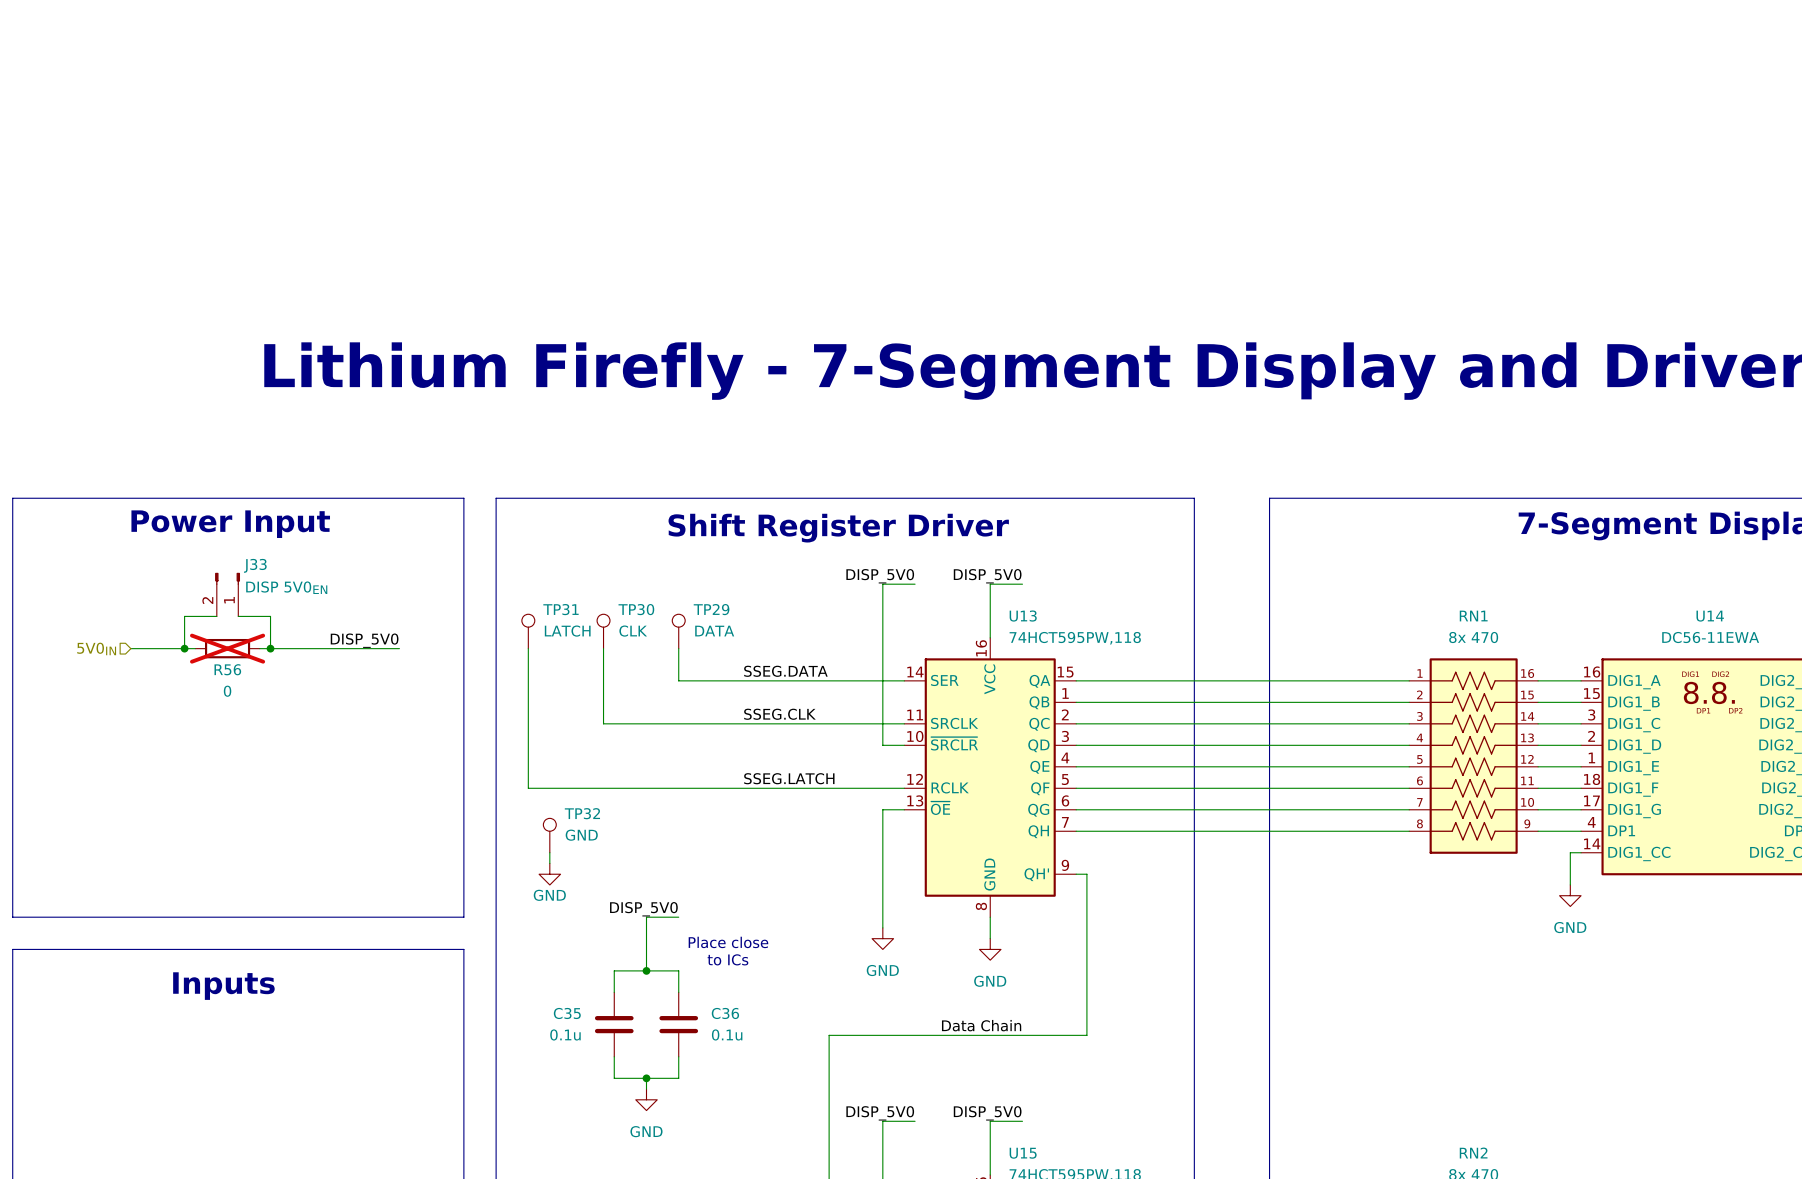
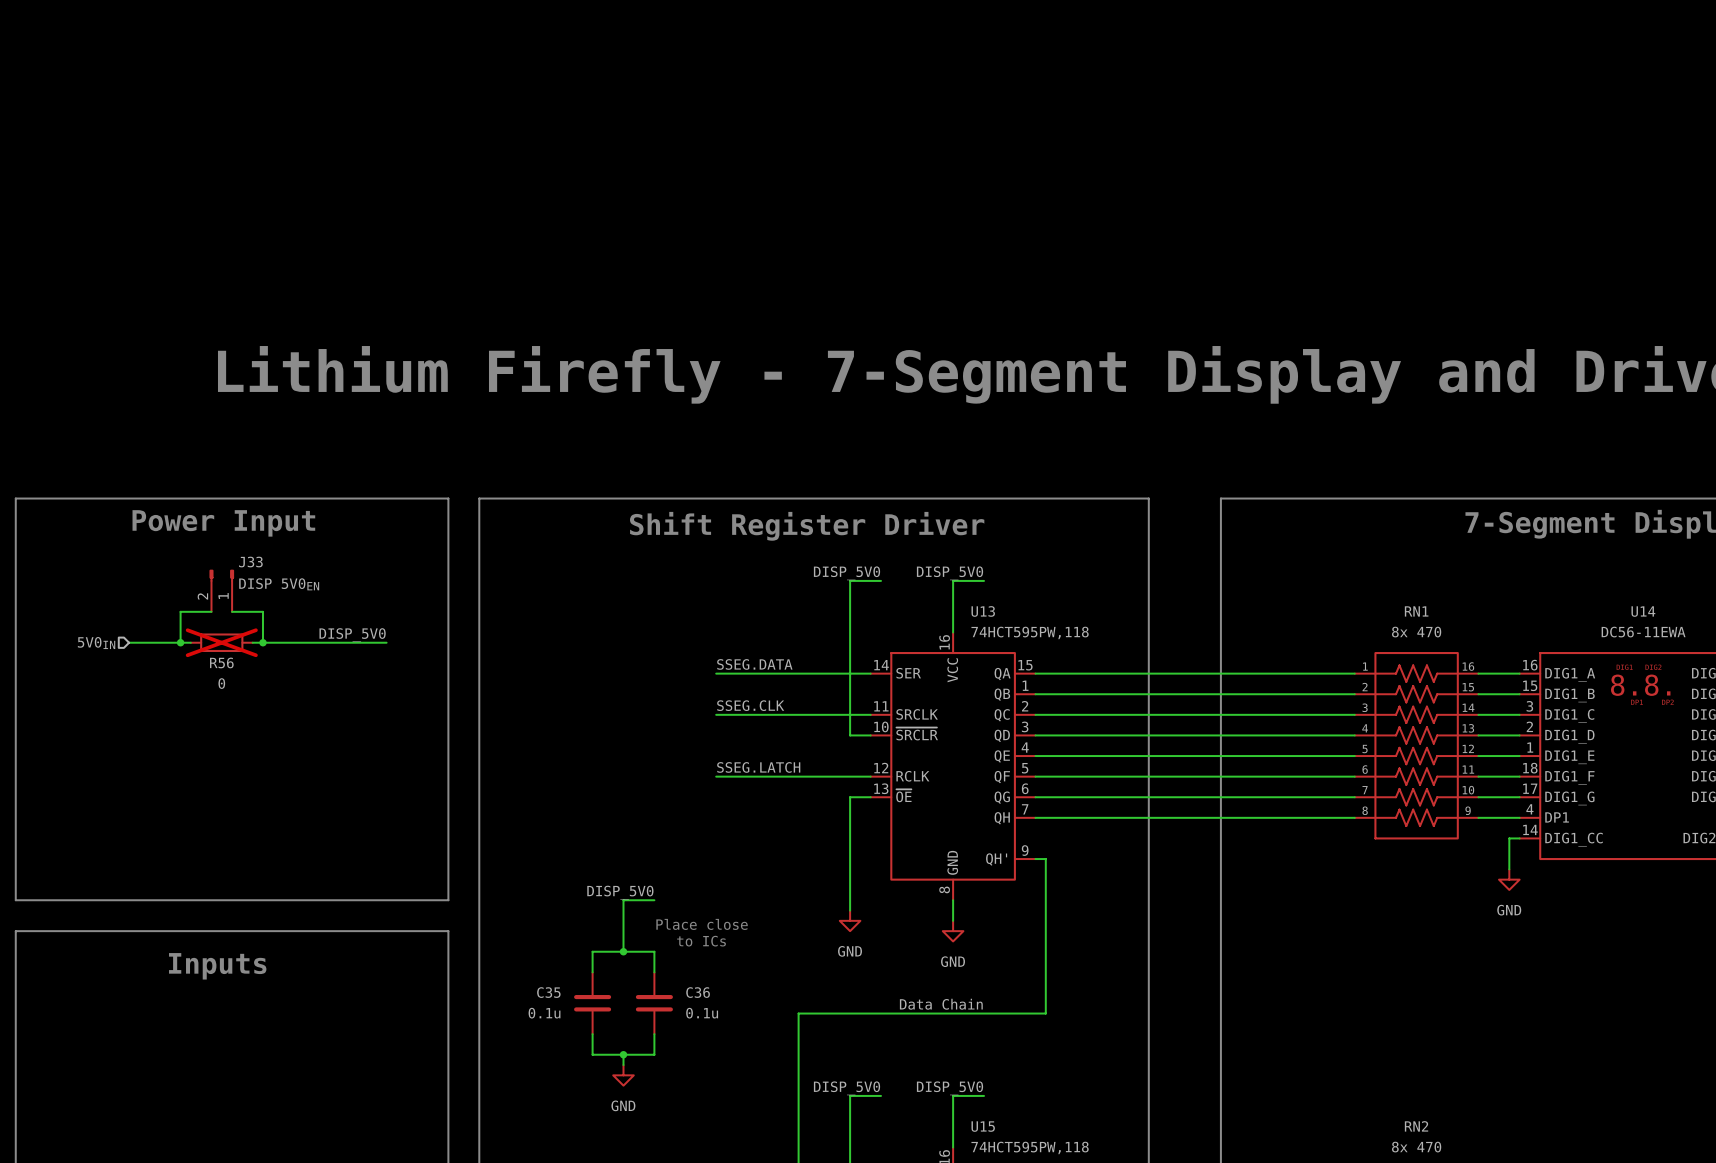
TP31: LATCH (528, 631) -> none
TP30: CLK (603, 631) -> none
TP29: DATA (678, 631) -> none
wire: (528, 648) (528, 788) (743, 788) -> none
wire: (603, 648) (603, 723) (743, 723) -> none
wire: (678, 648) (678, 680) (743, 680) -> none
TP32: GND (549, 835) -> none
wire: (549, 852) (549, 863) -> none
power symbol: GND (549, 874) -> none

